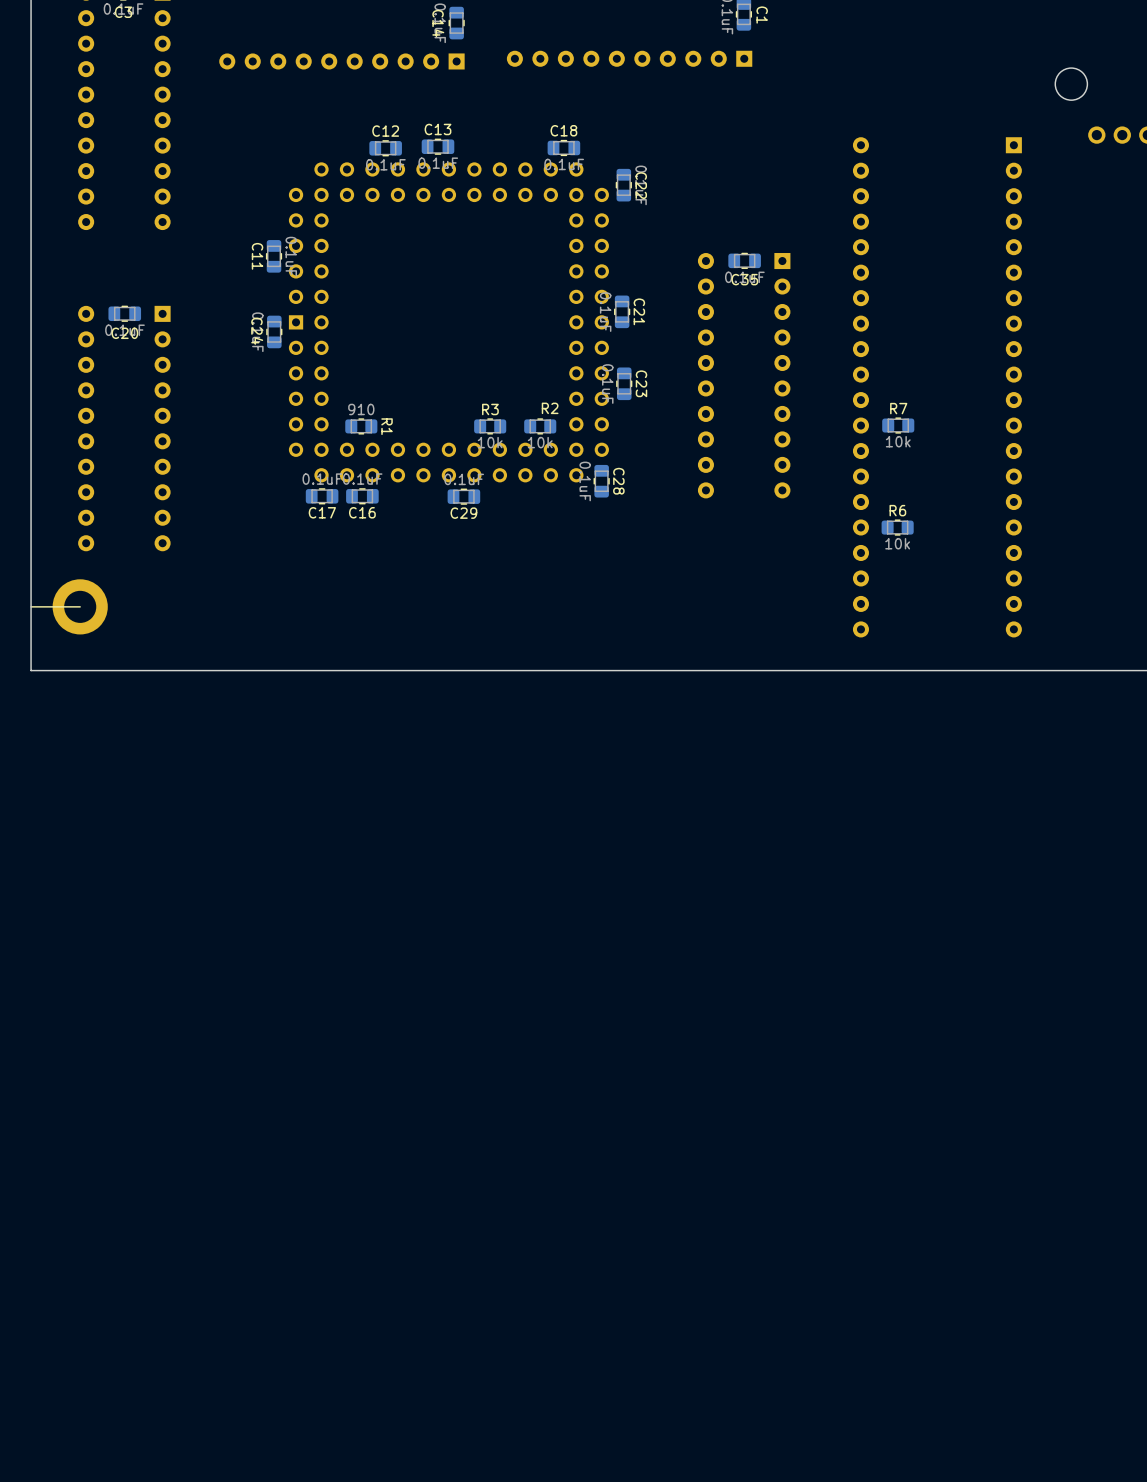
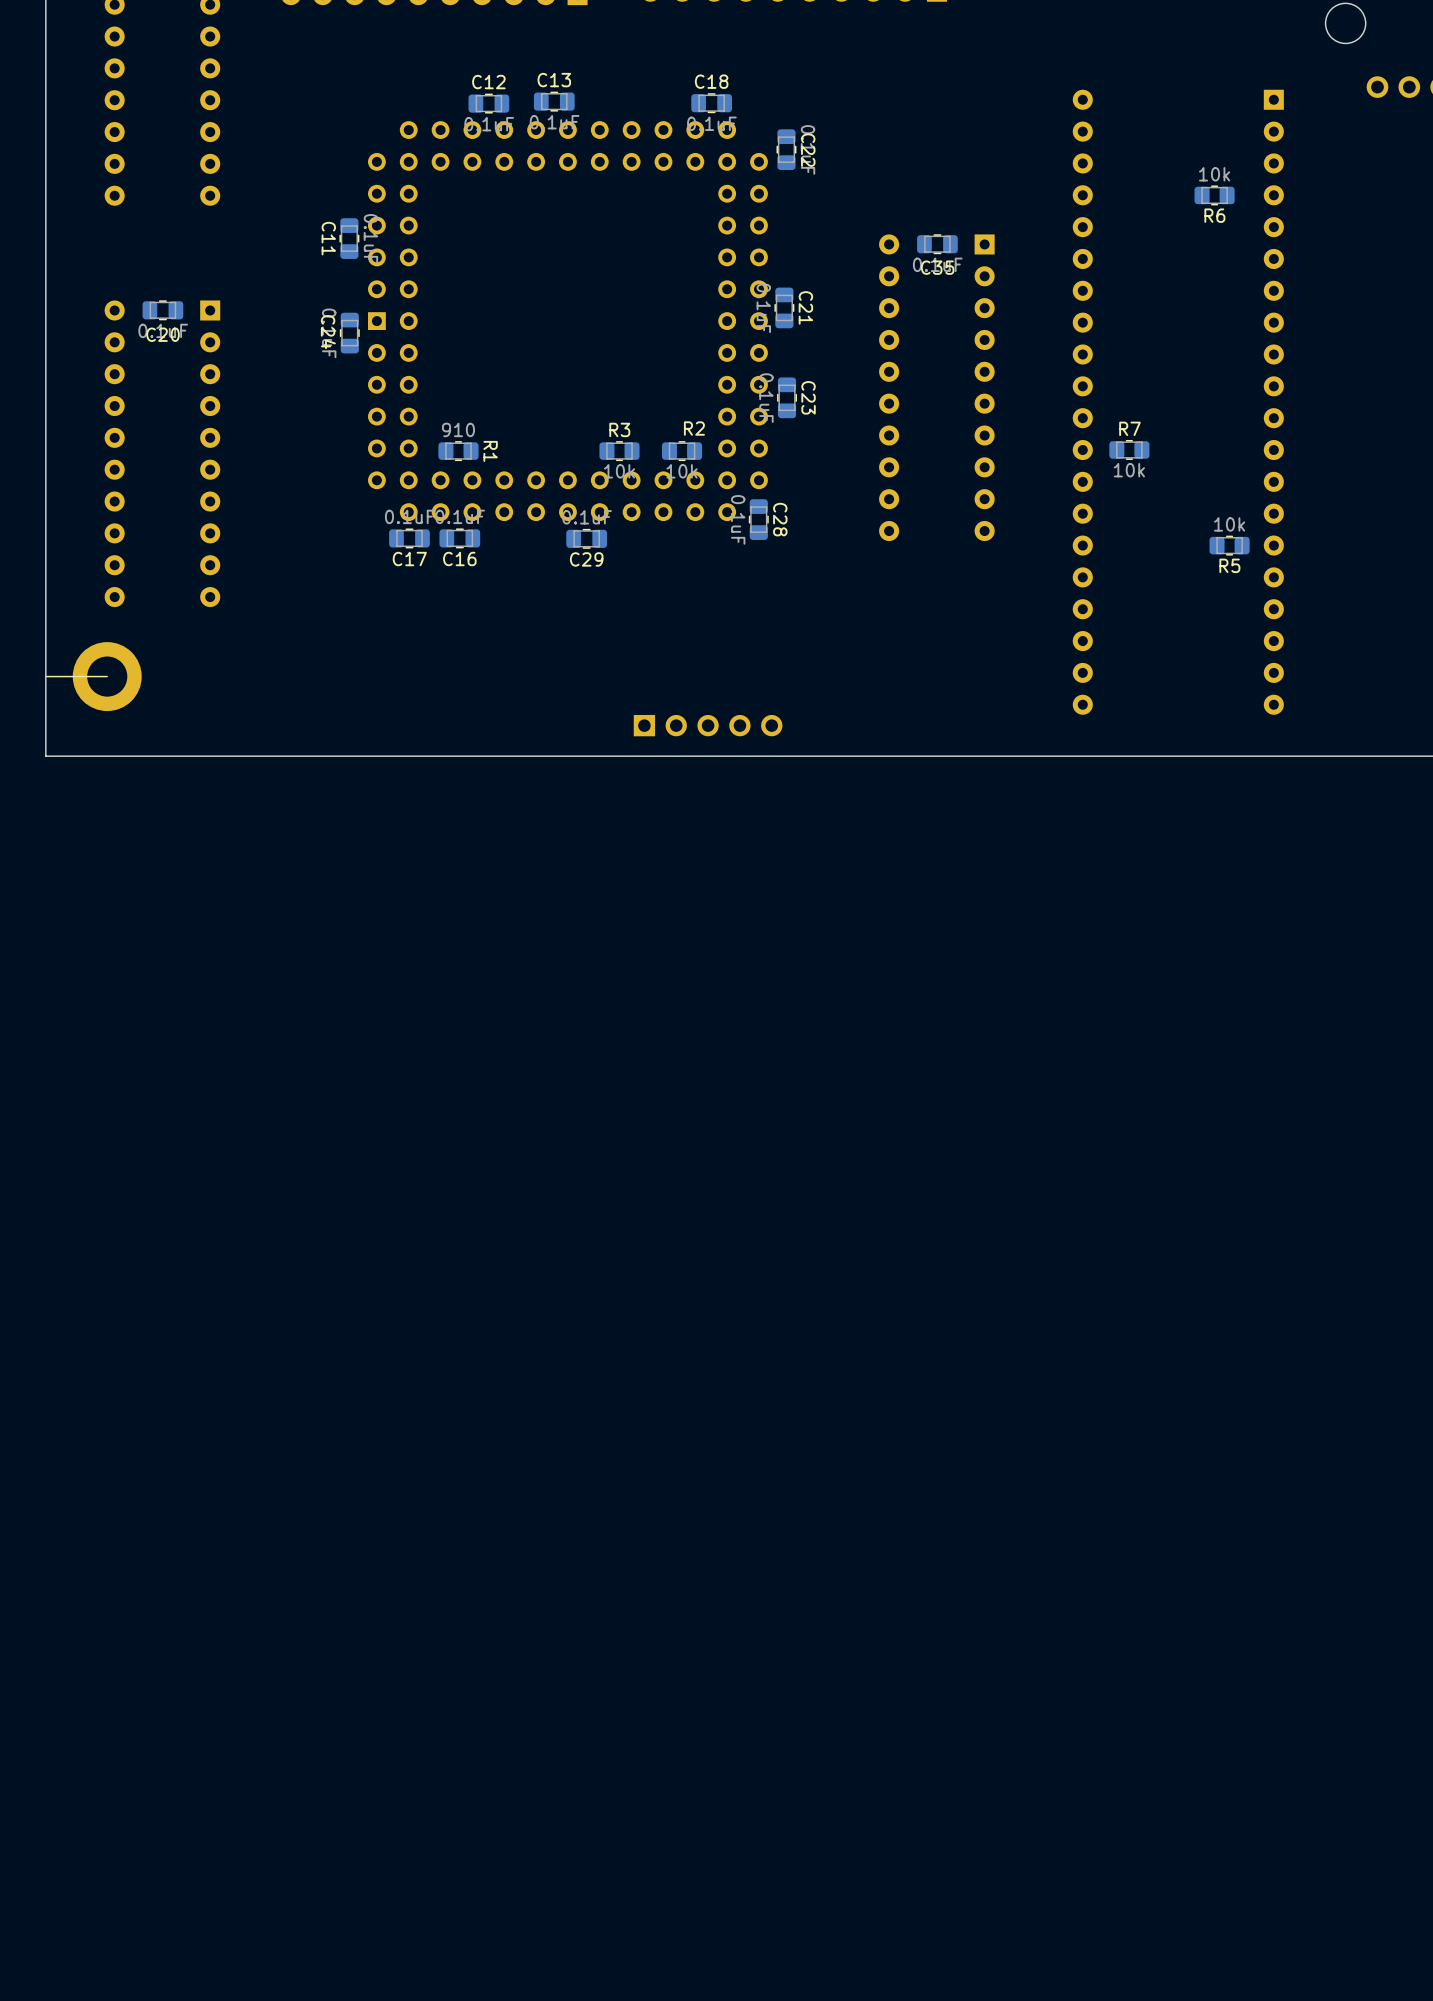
R5: none -> 10k (1229, 545)
R6 name position: R6 (897, 510) -> R6 (1214, 215)
R6 position: (897, 527) -> (1214, 195)
R6 value position: 10k (897, 543) -> 10k (1214, 174)
part: none -> (708, 725)

